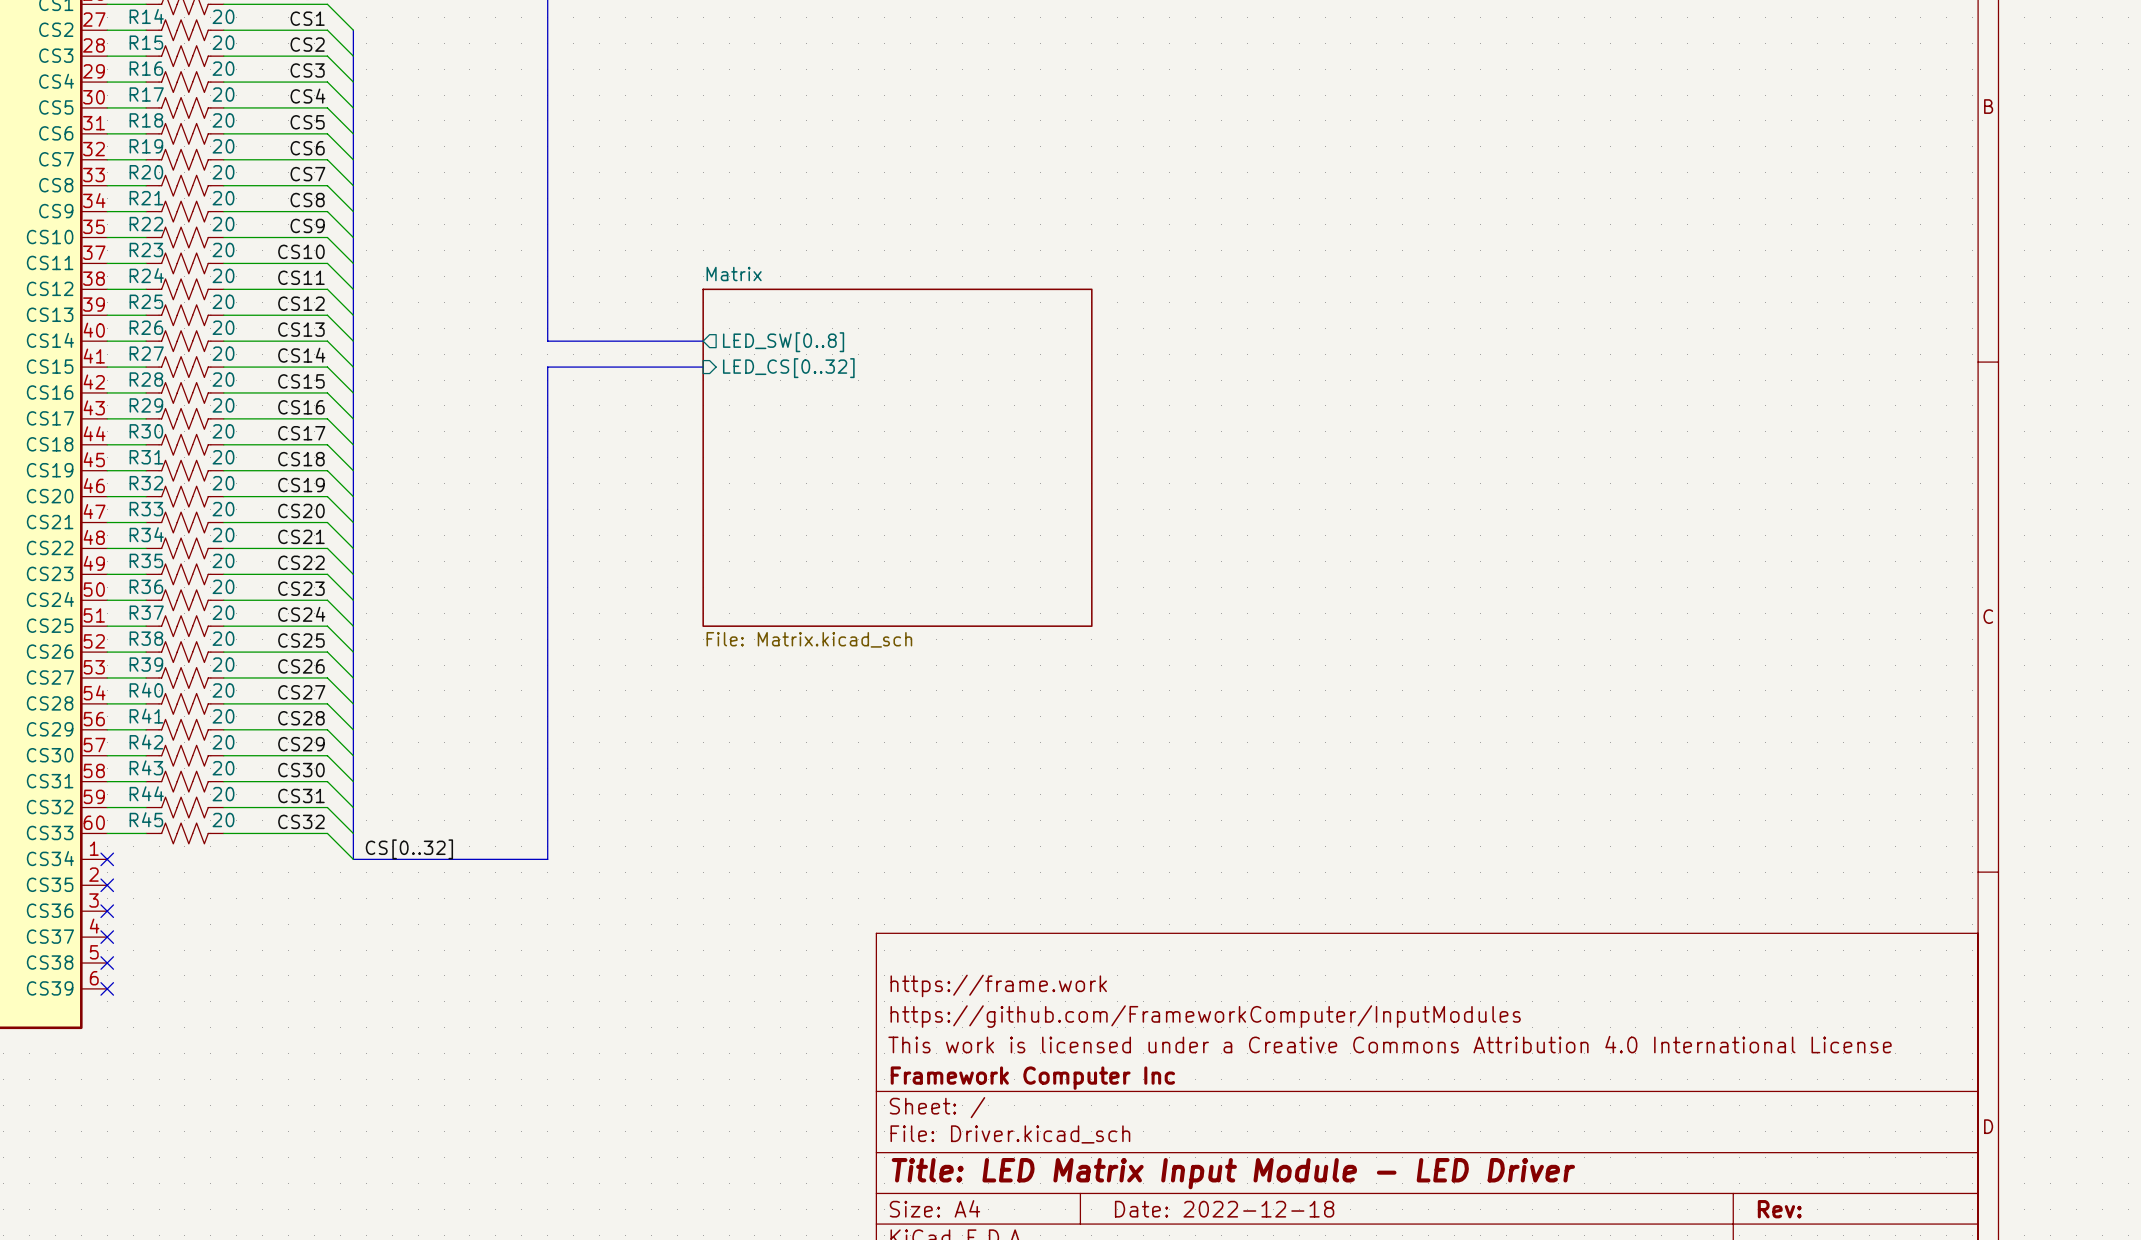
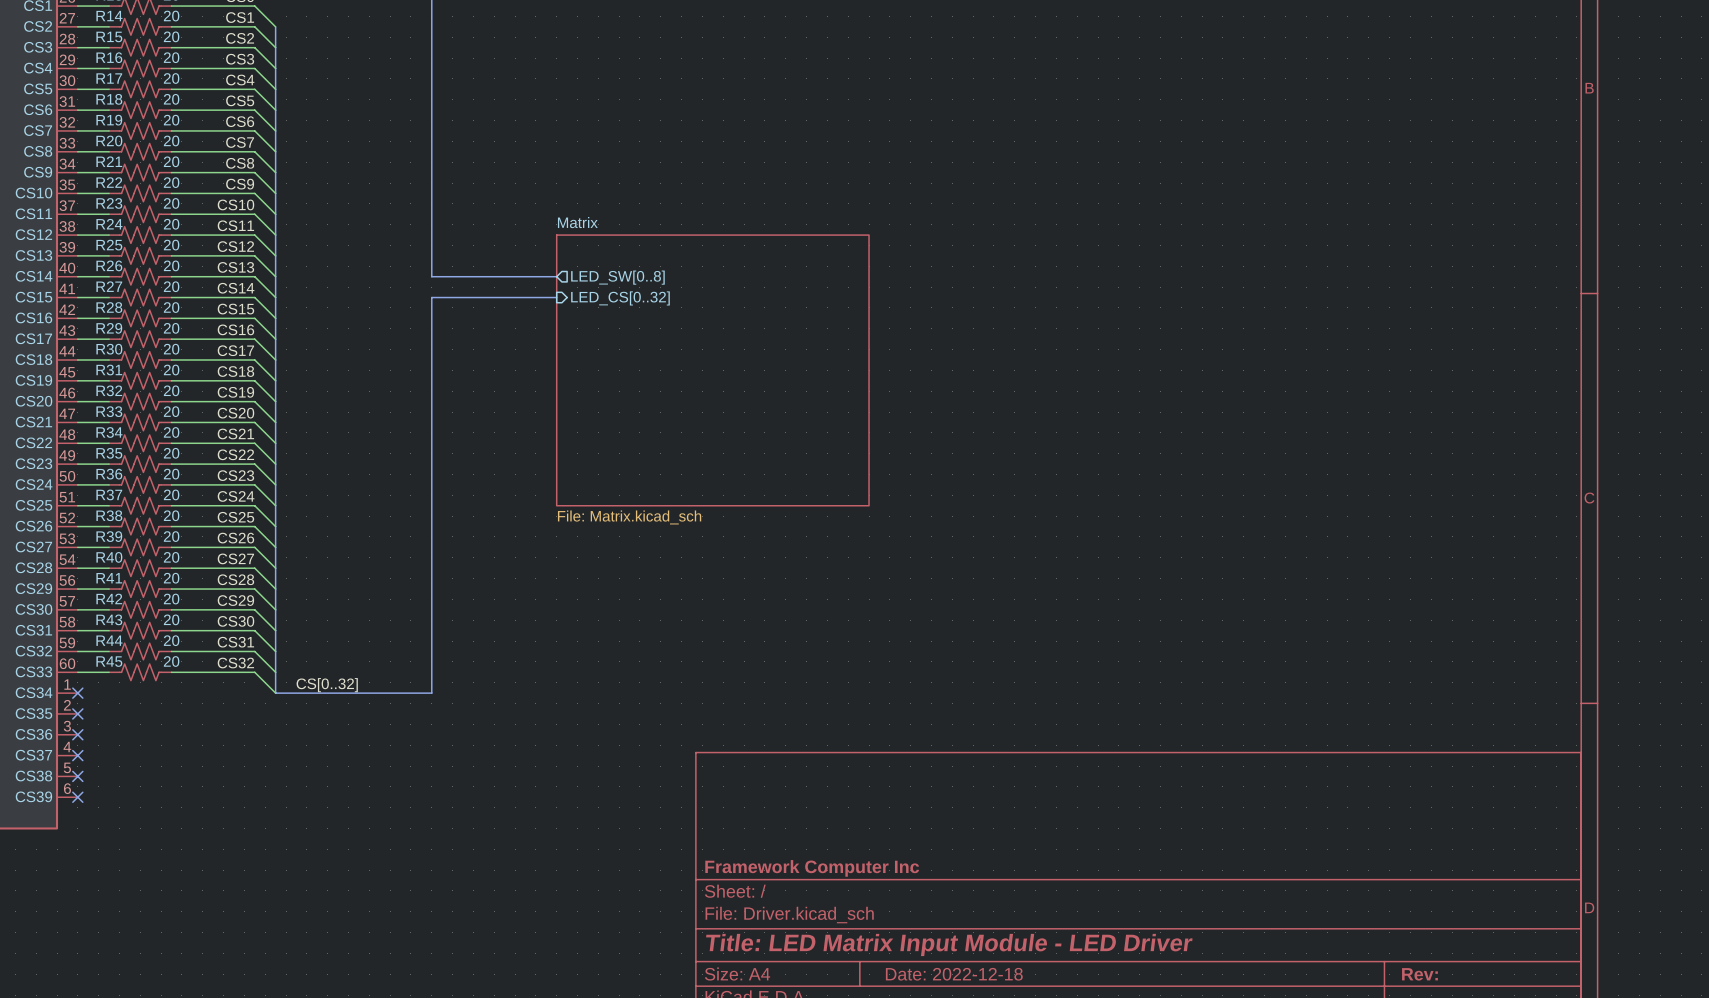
title block: https://frame.work (998, 985) -> none
title block: https://github.com/FrameworkComputer/InputModules (1205, 1016) -> none
title block: This work is licensed under a Creative Commons Attribution 4.0 International License (1390, 1044) -> none

